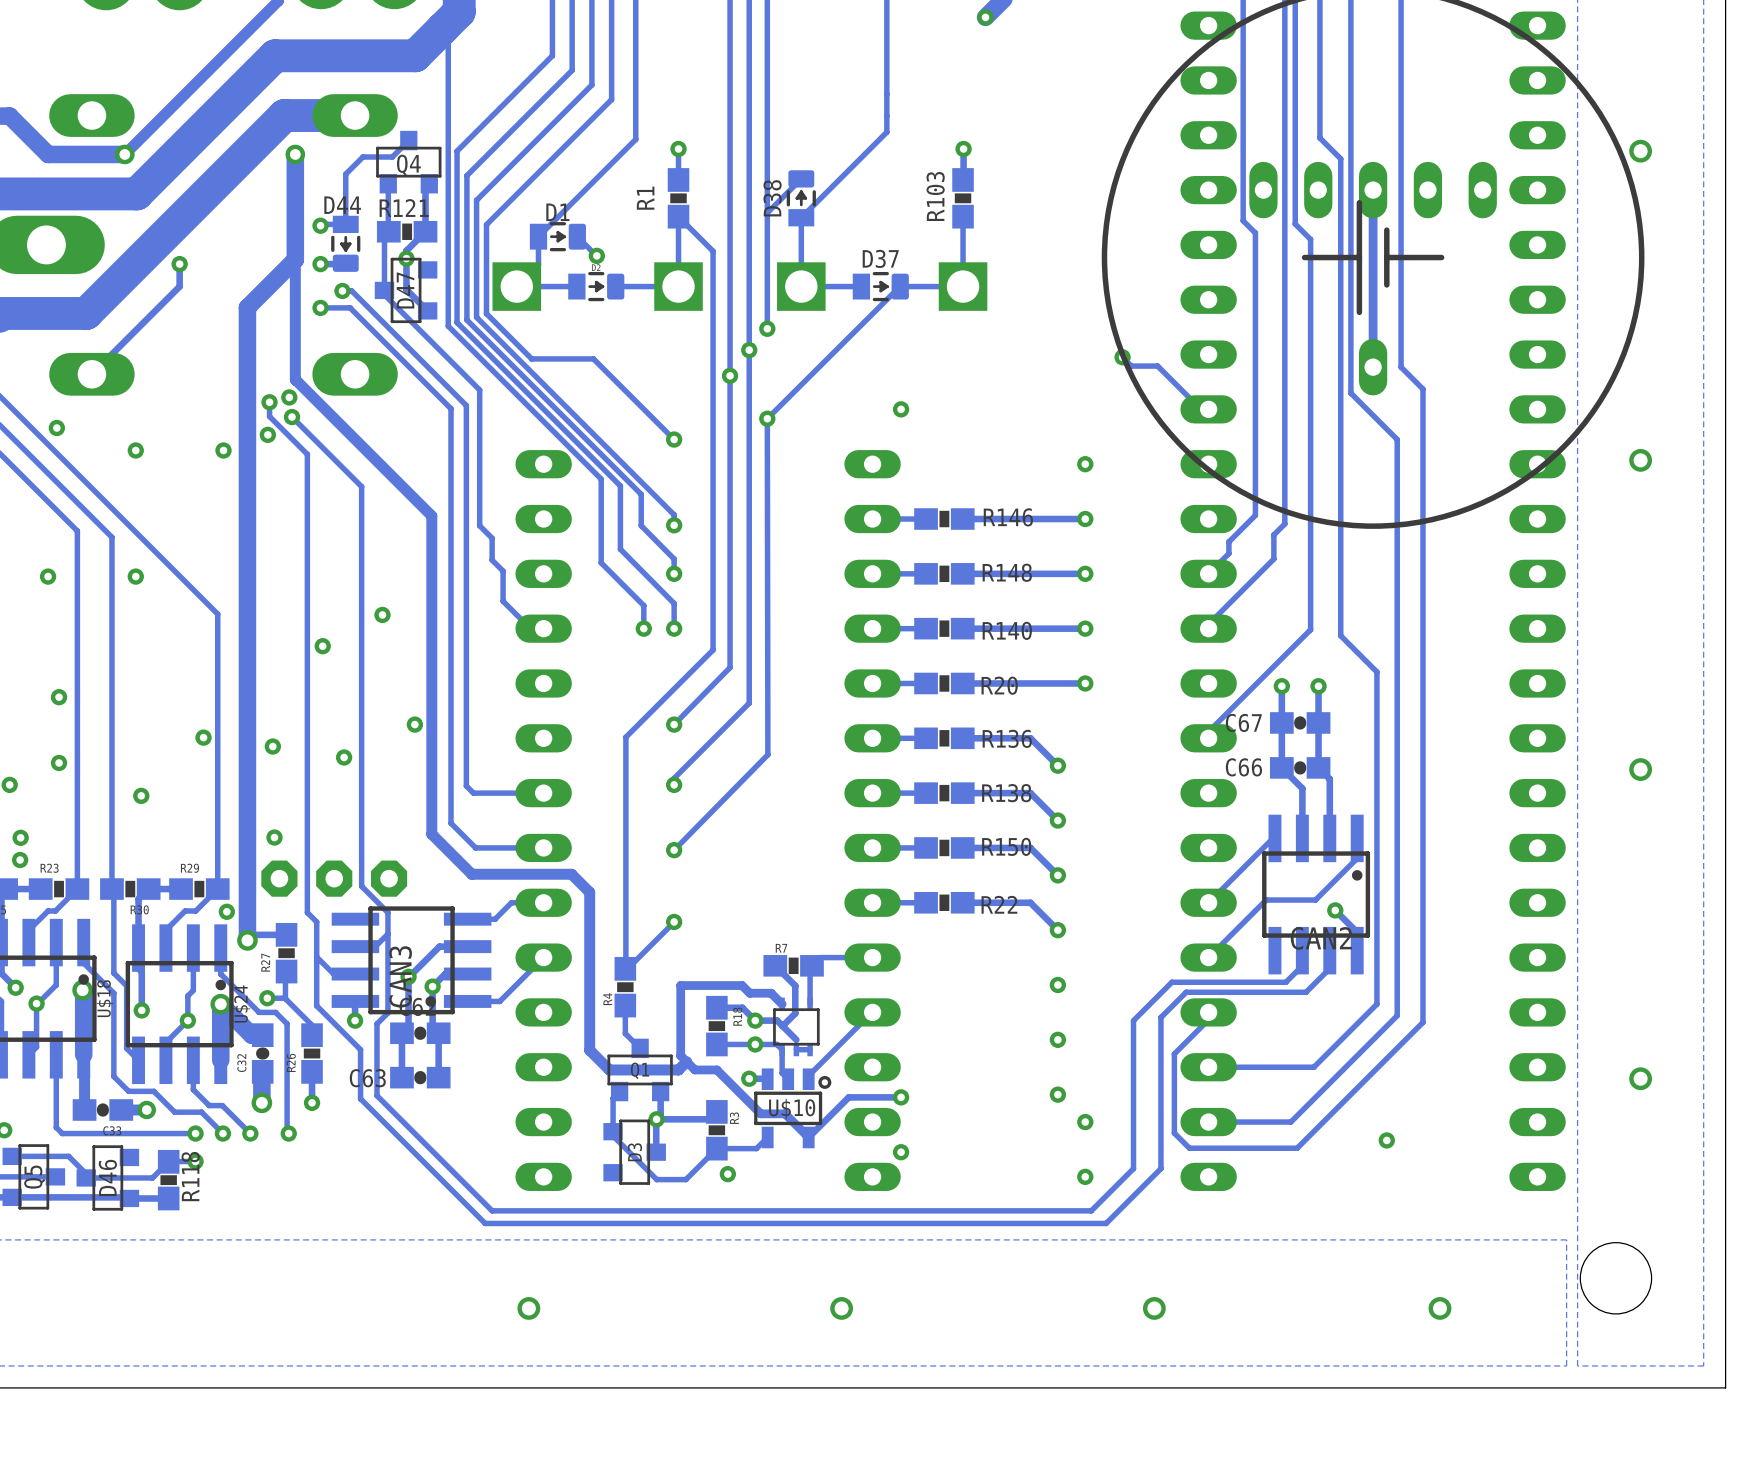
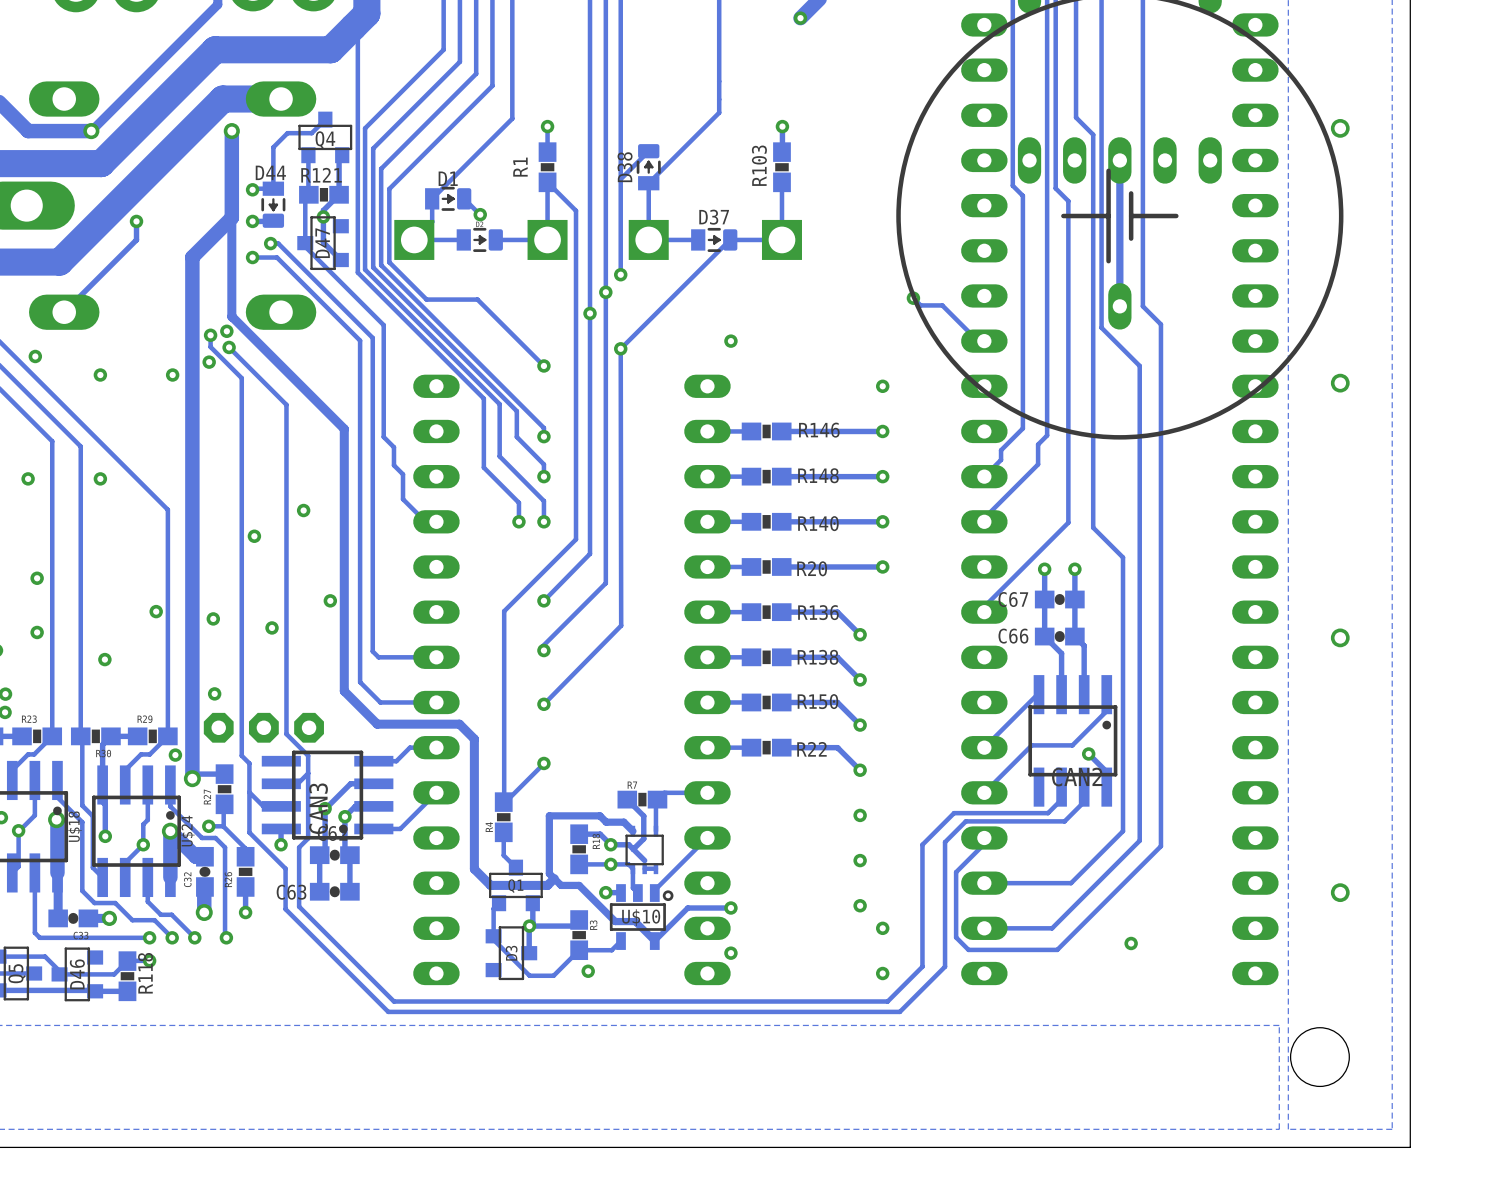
via: (528, 1308) -> none
via: (841, 1308) -> none
via: (1154, 1308) -> none
via: (1439, 1308) -> none

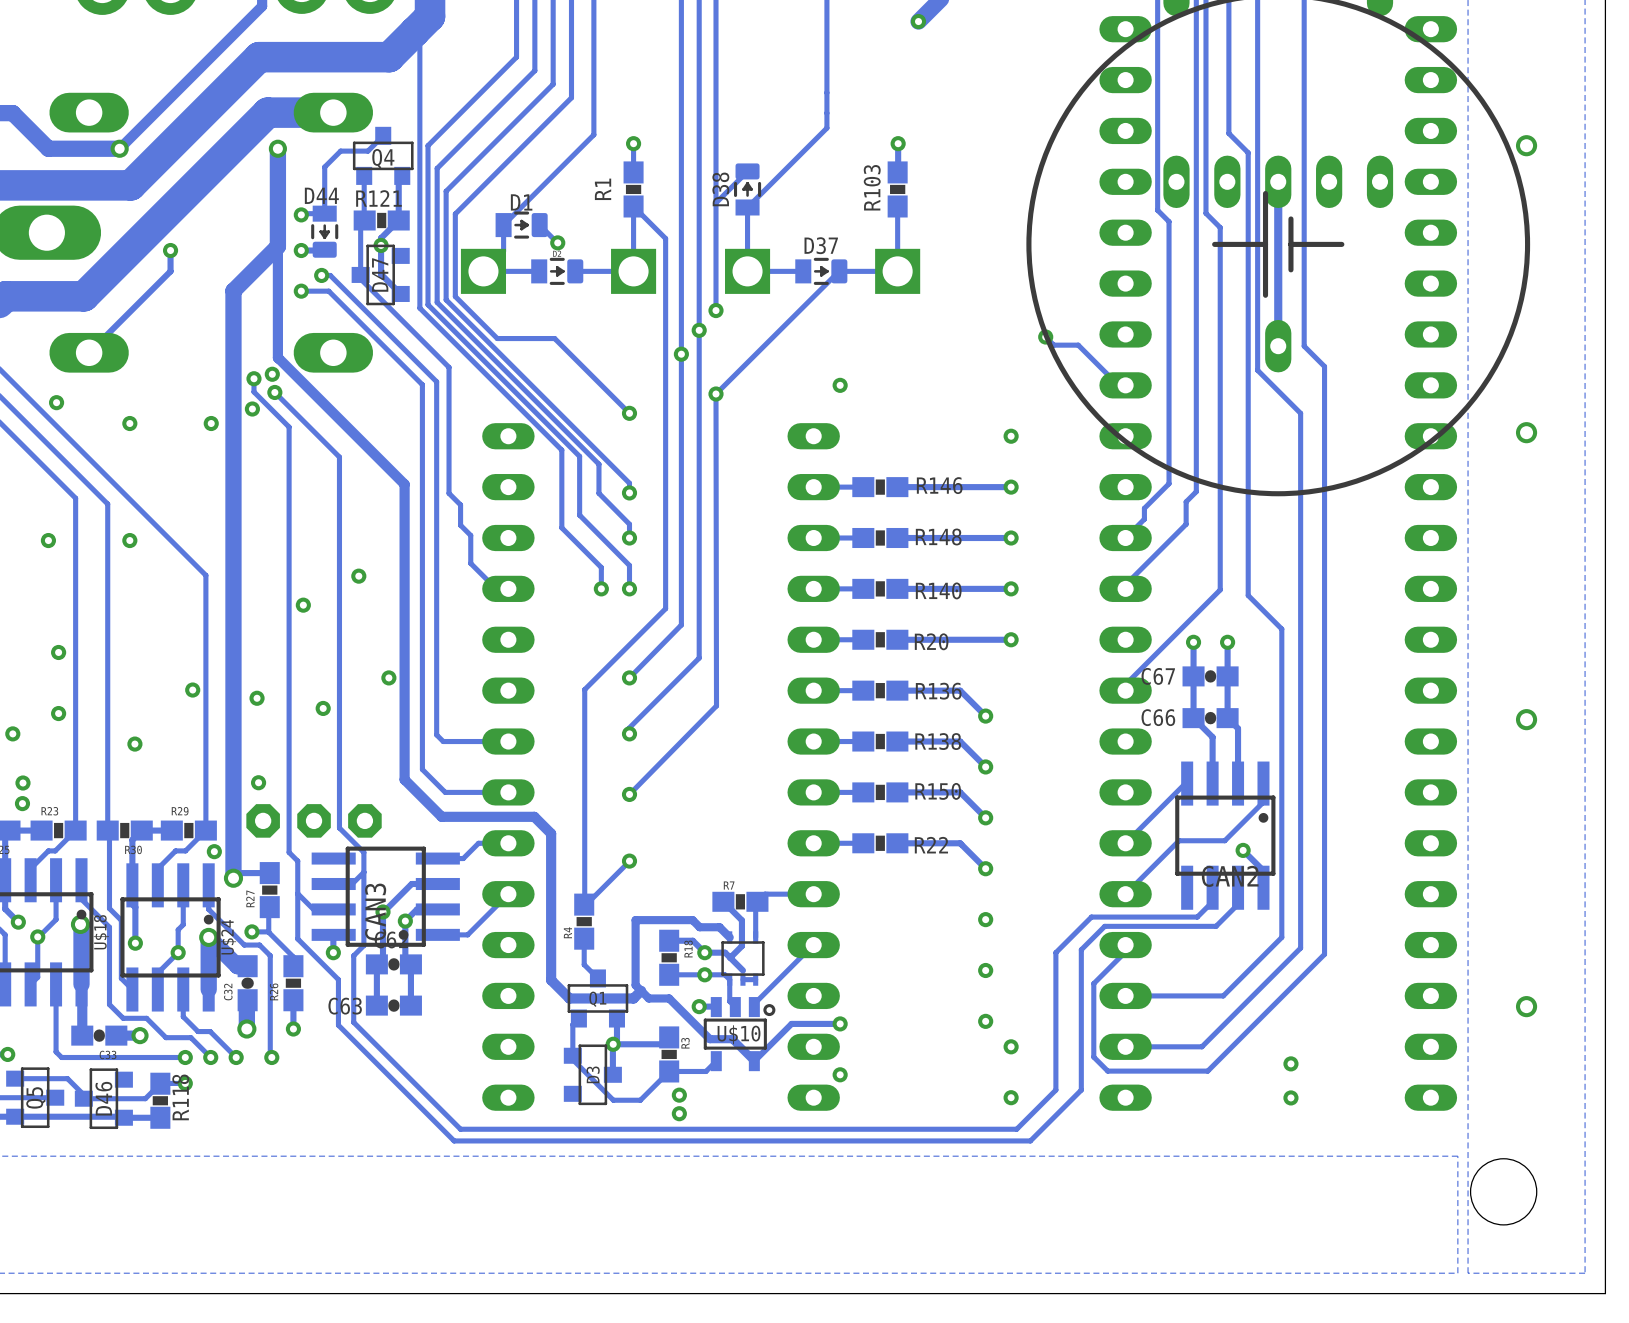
via: none -> (1290, 1097)
via: none -> (679, 1113)

